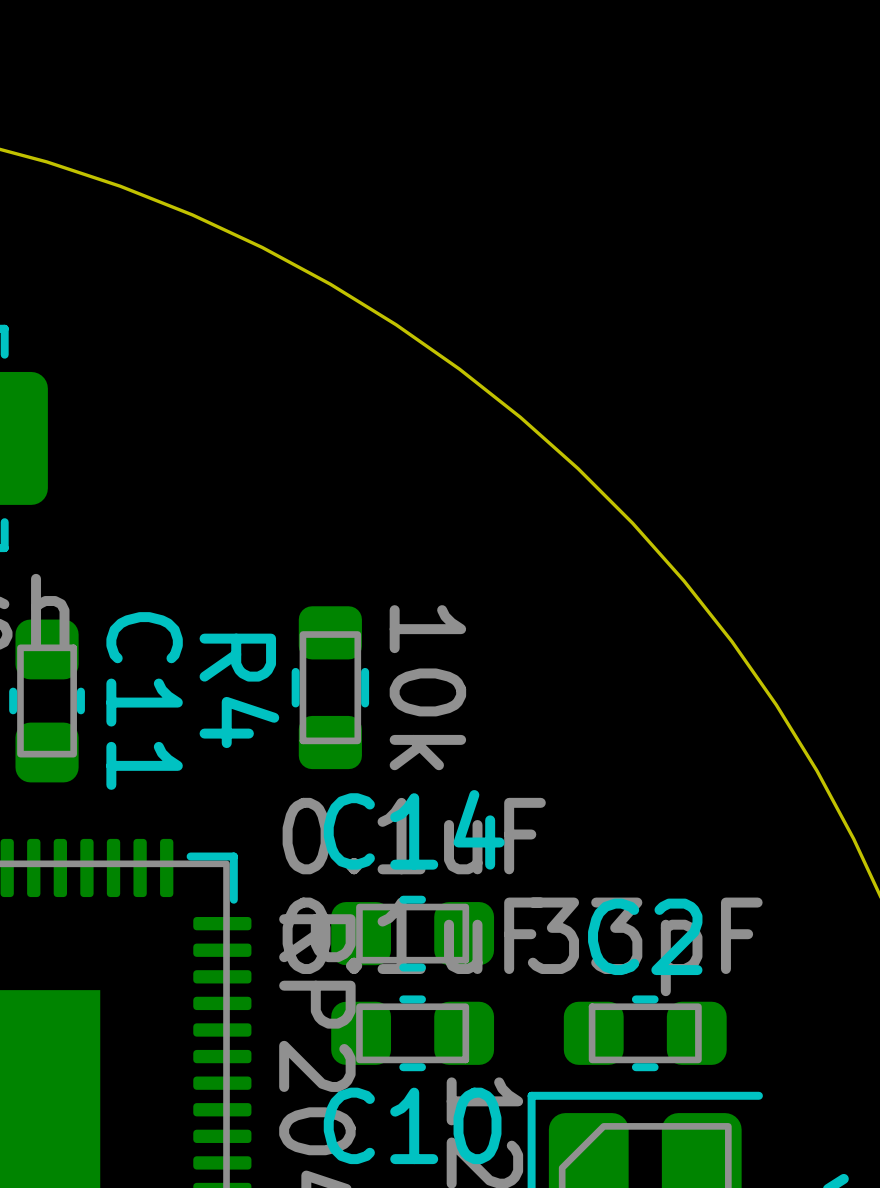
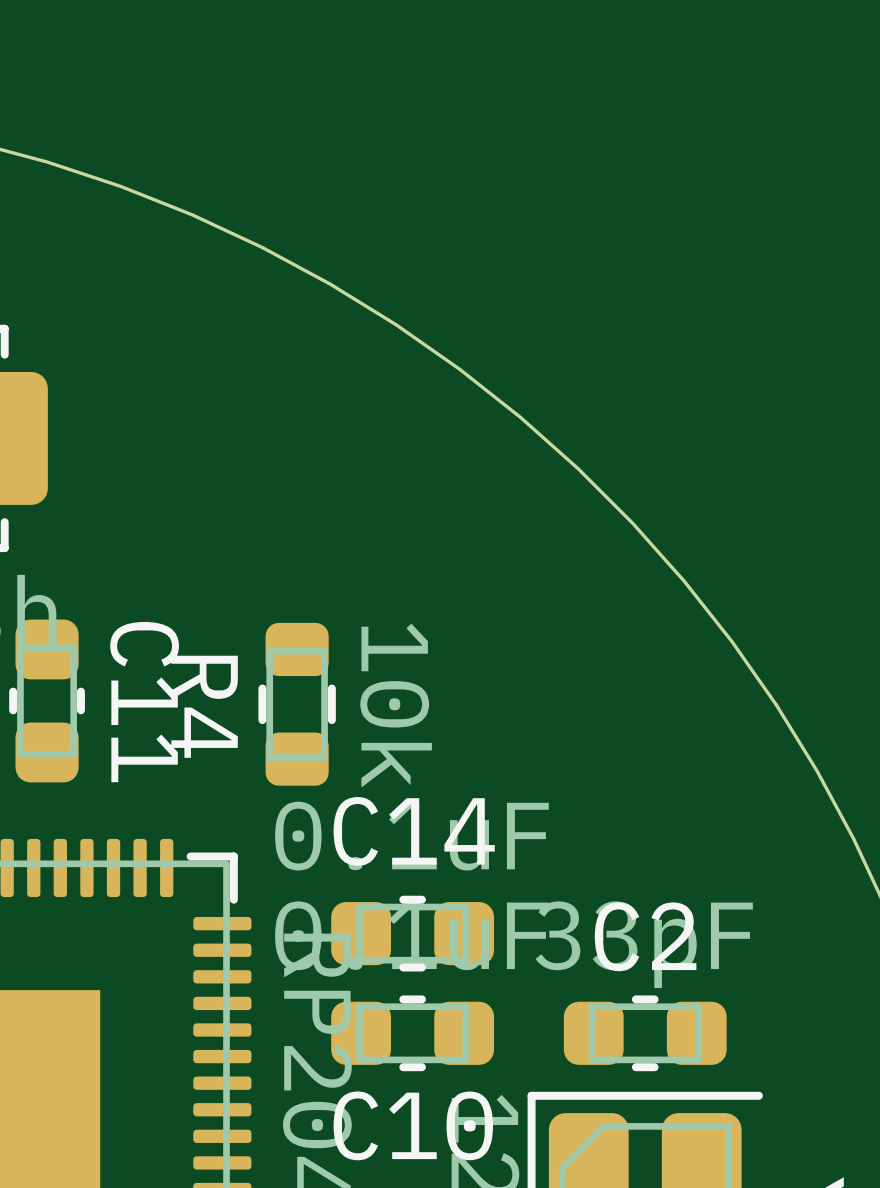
R4 position: (330, 687) -> (297, 704)

